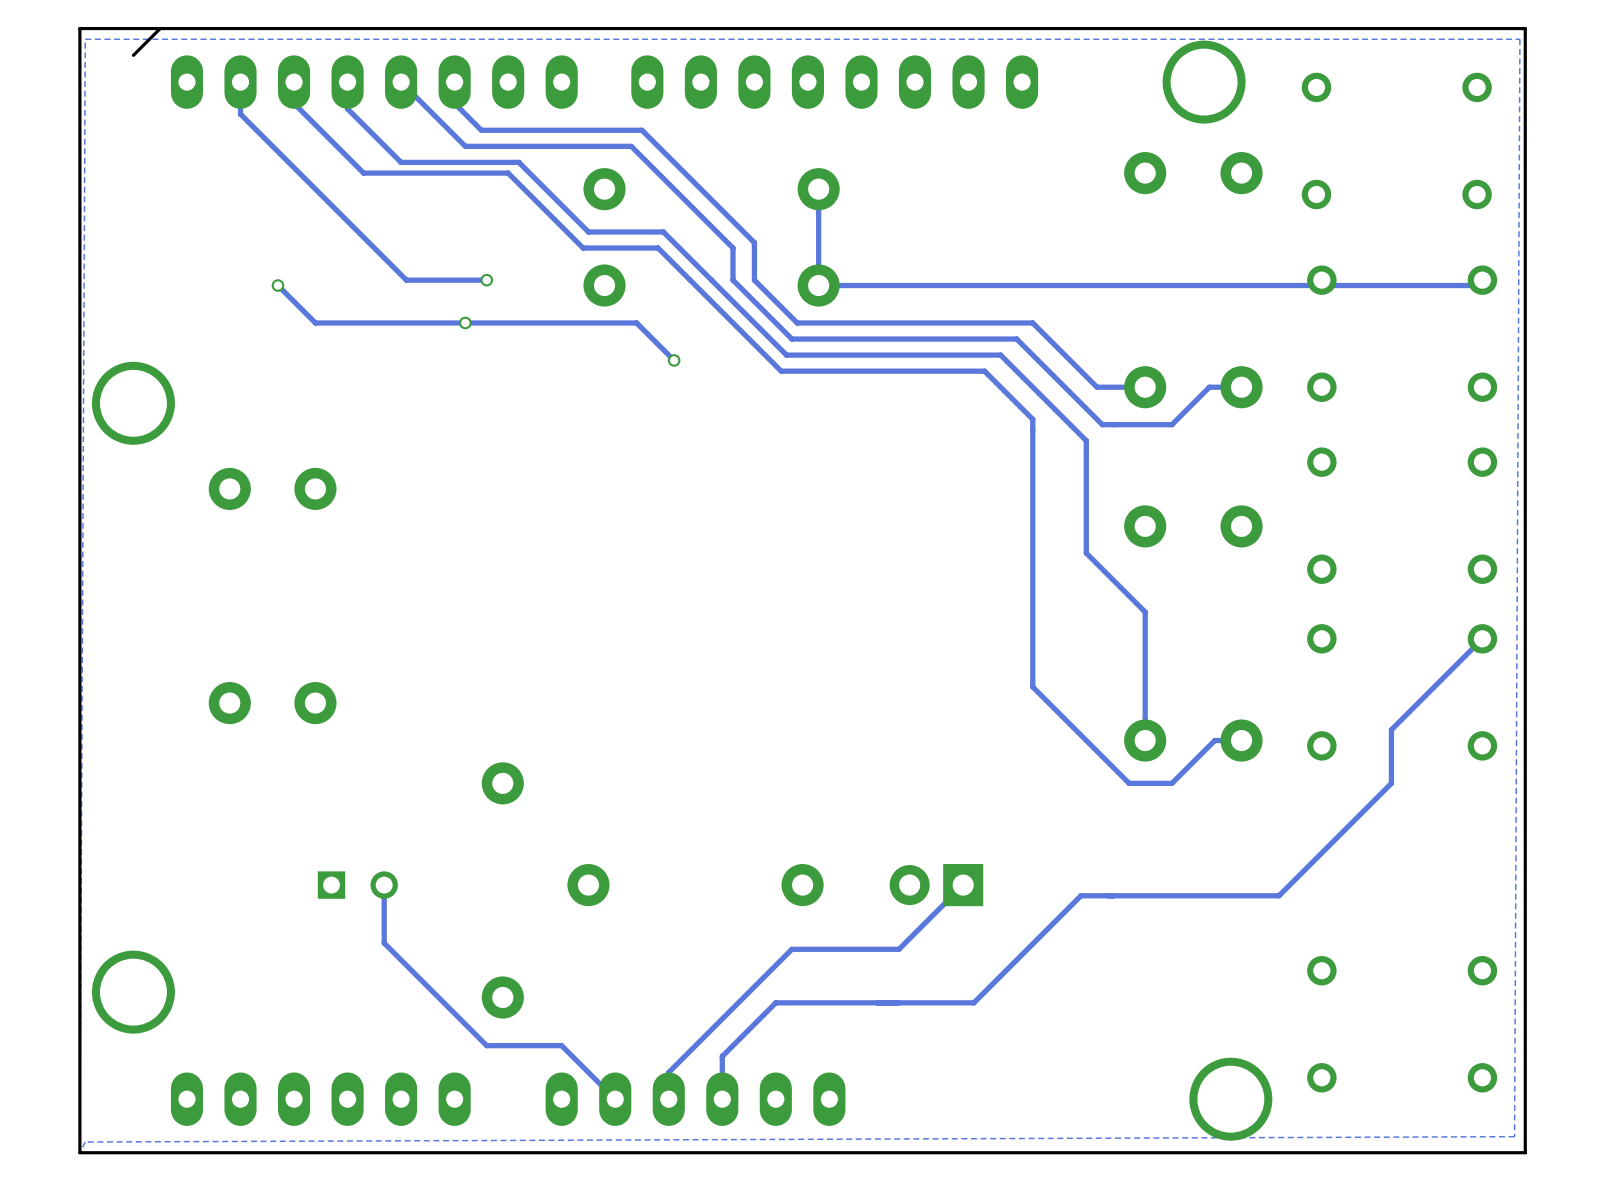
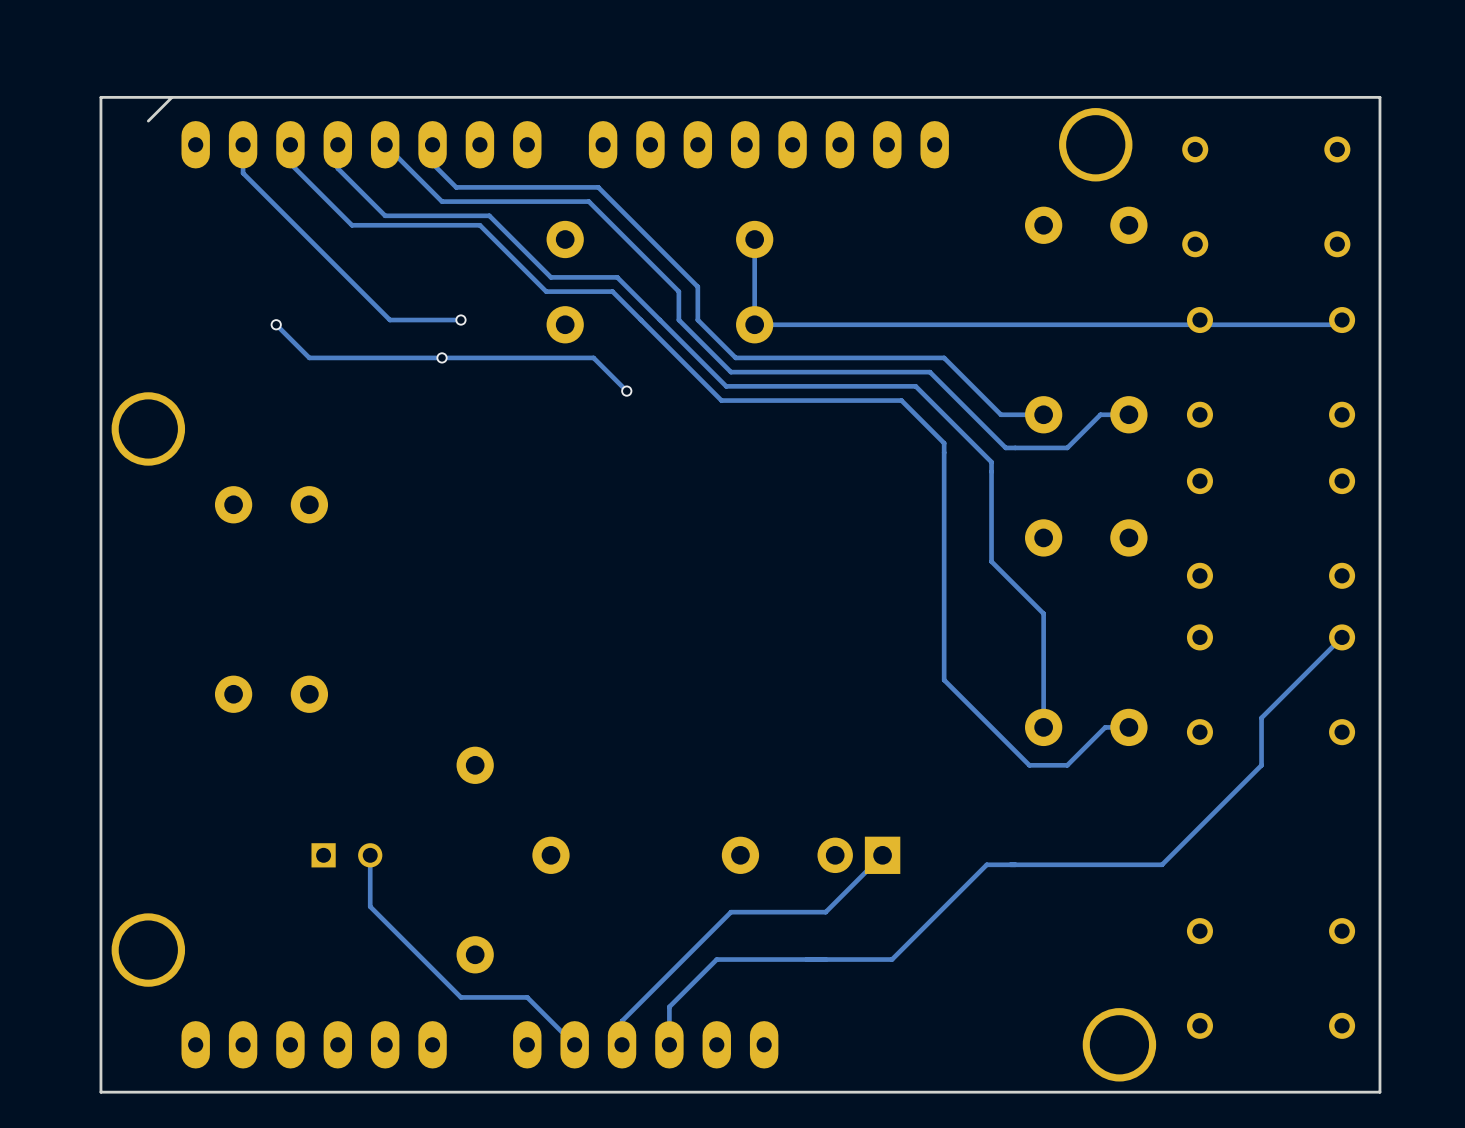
zone outline: (1519, 39) (85, 39) (79, 1152) (85, 1142) (1514, 1136) (1519, 39) -> none

